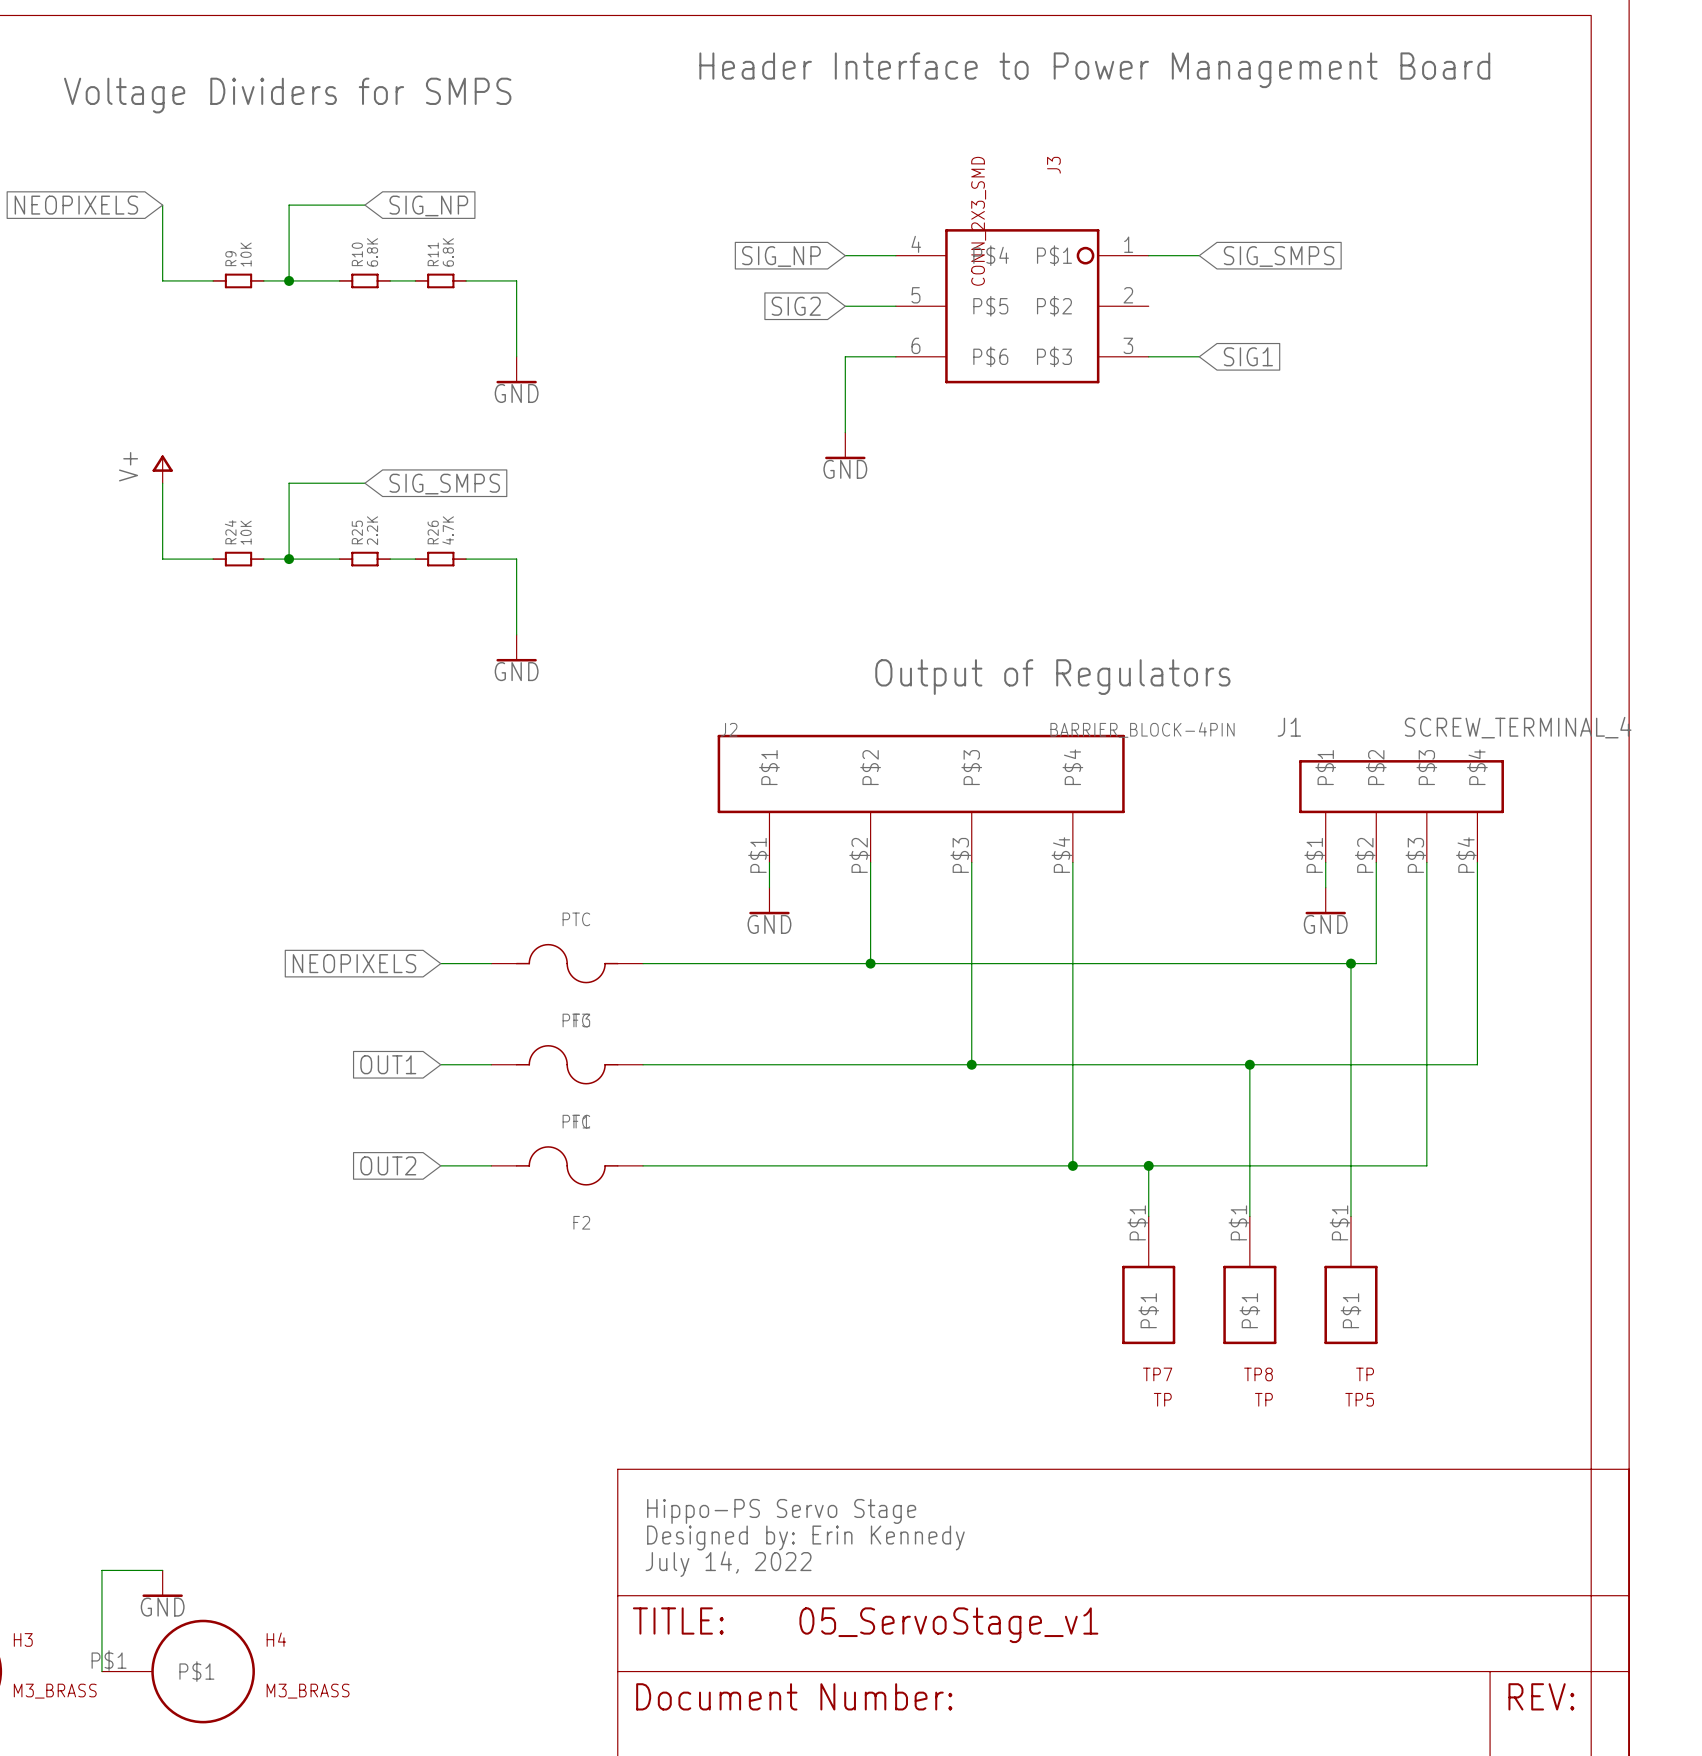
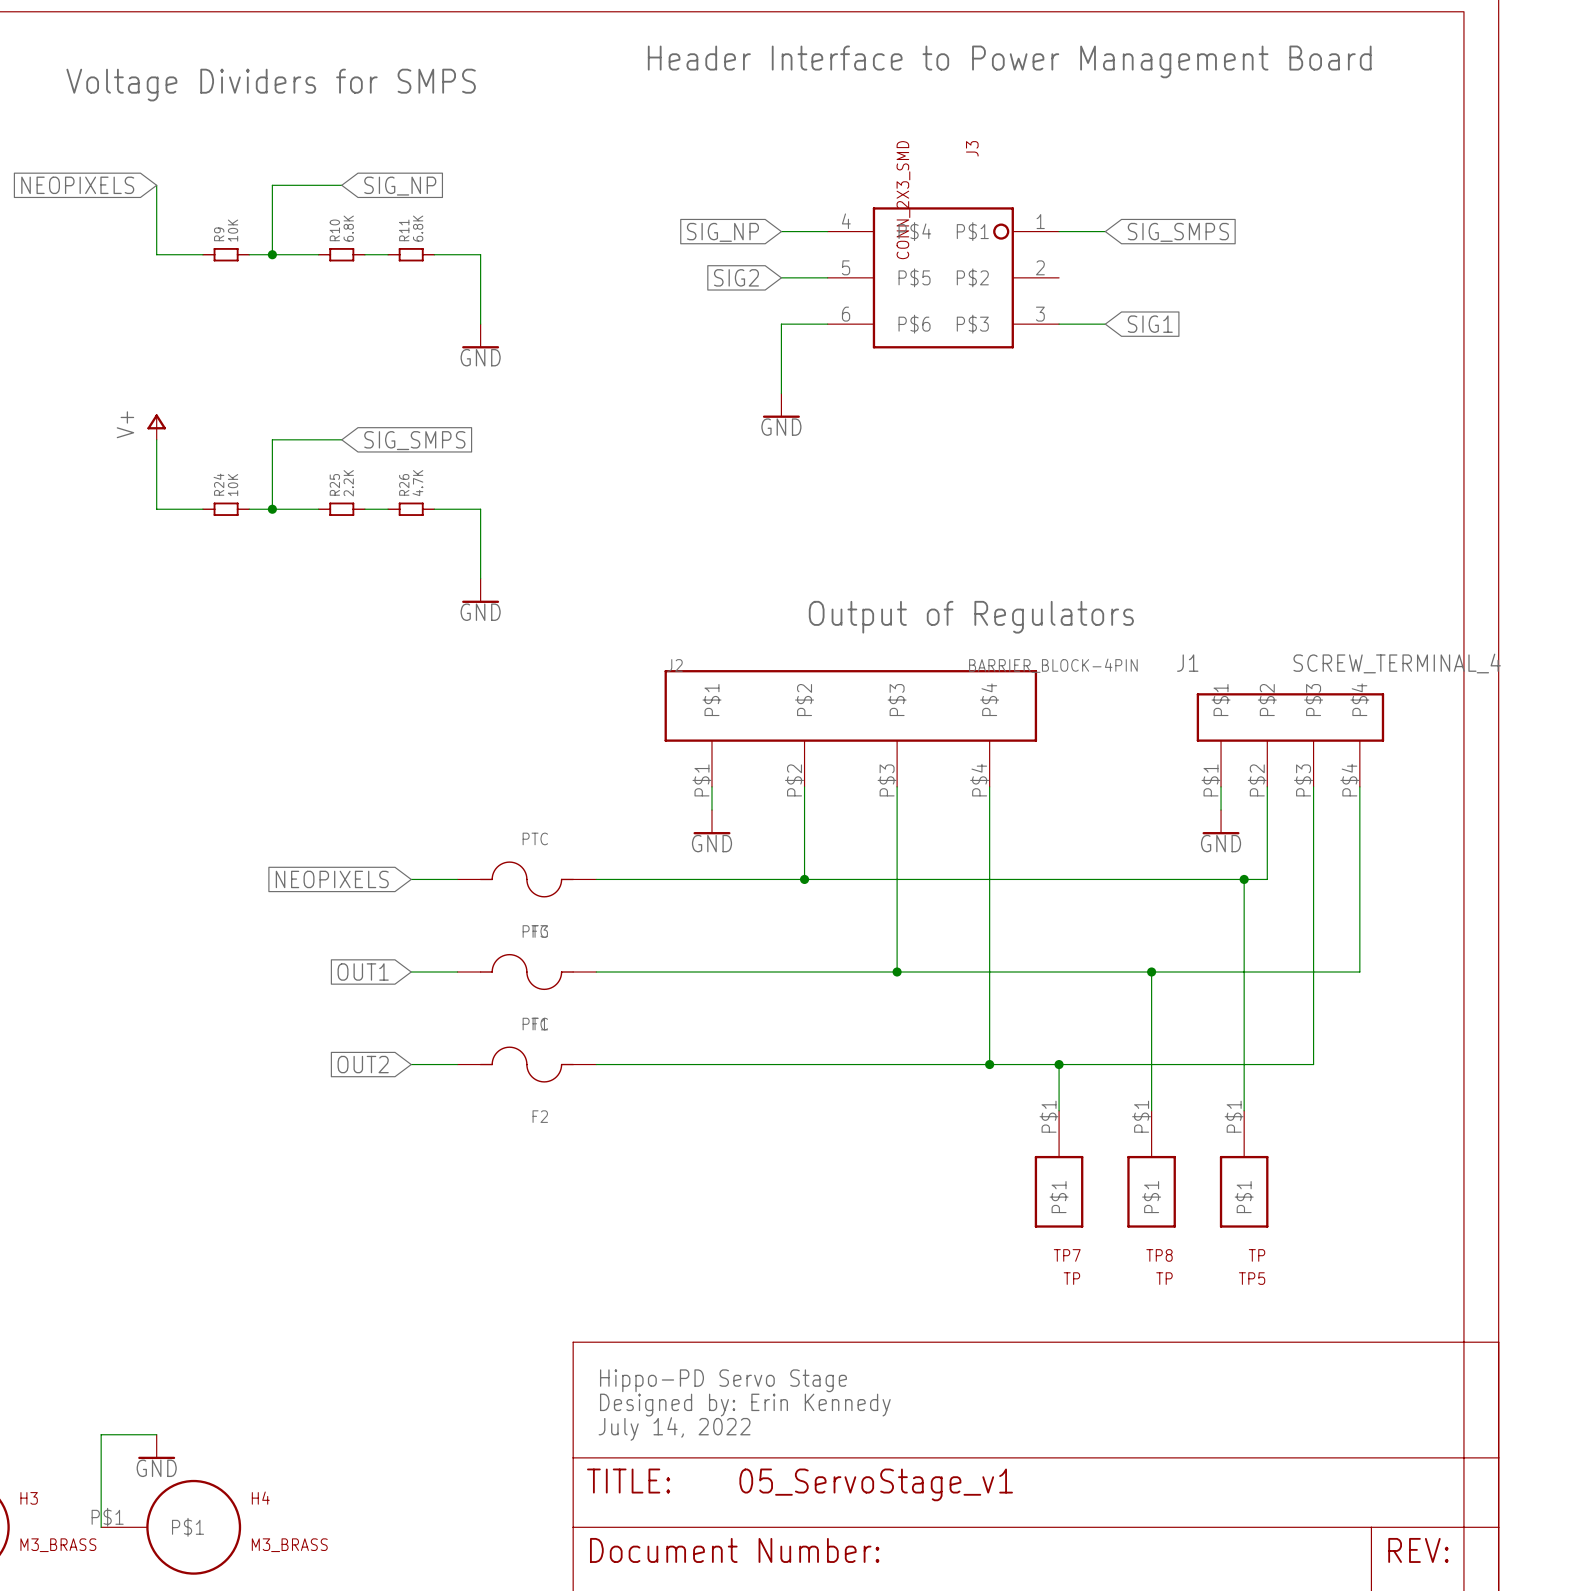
text: Hippo-PS Servo Stage (781, 1511) -> Hippo-PD Servo Stage (723, 1380)

